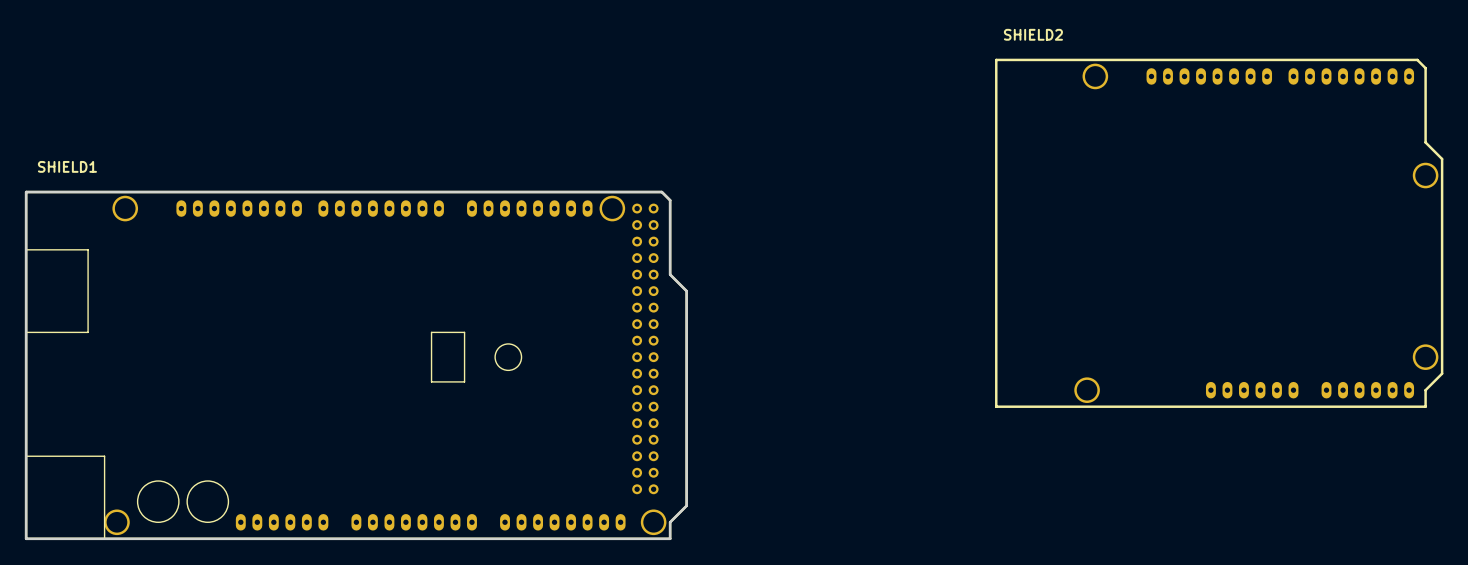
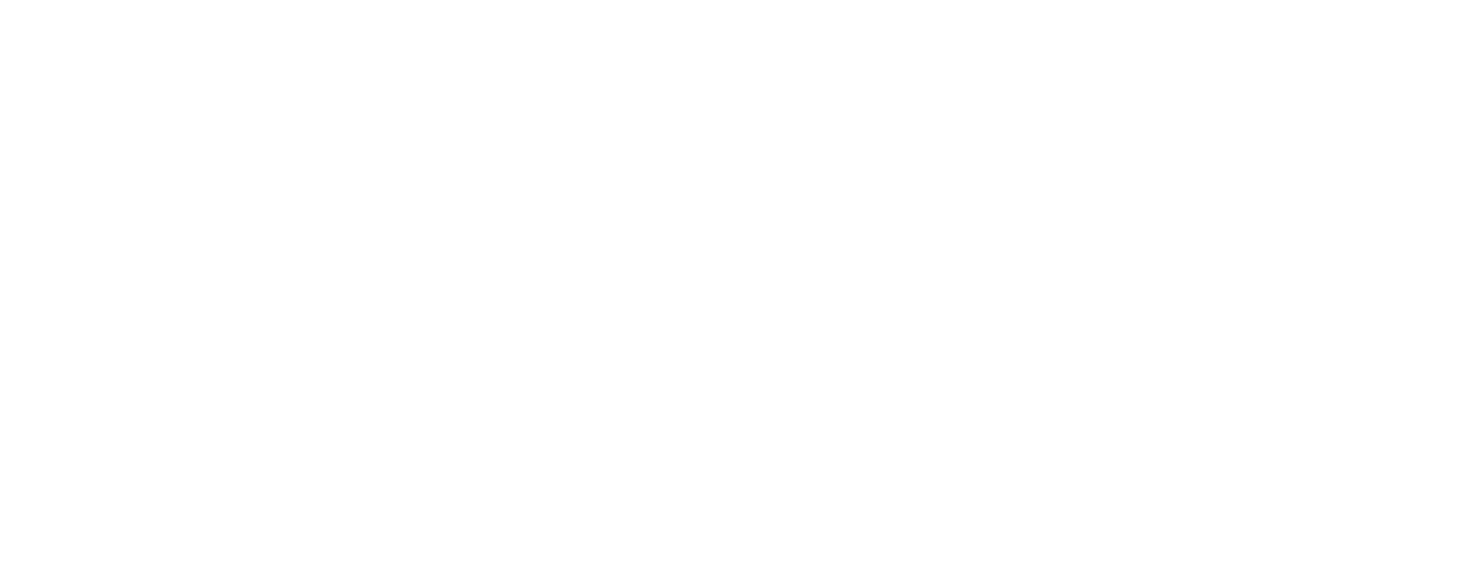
board edge: (26, 192) (661, 192) (670, 200) (670, 274) (686, 291) (686, 505) (670, 522) (670, 538) (26, 538) (26, 192) -> none
SHIELD2: (1219, 233) -> none
SHIELD1: (356, 365) -> none

